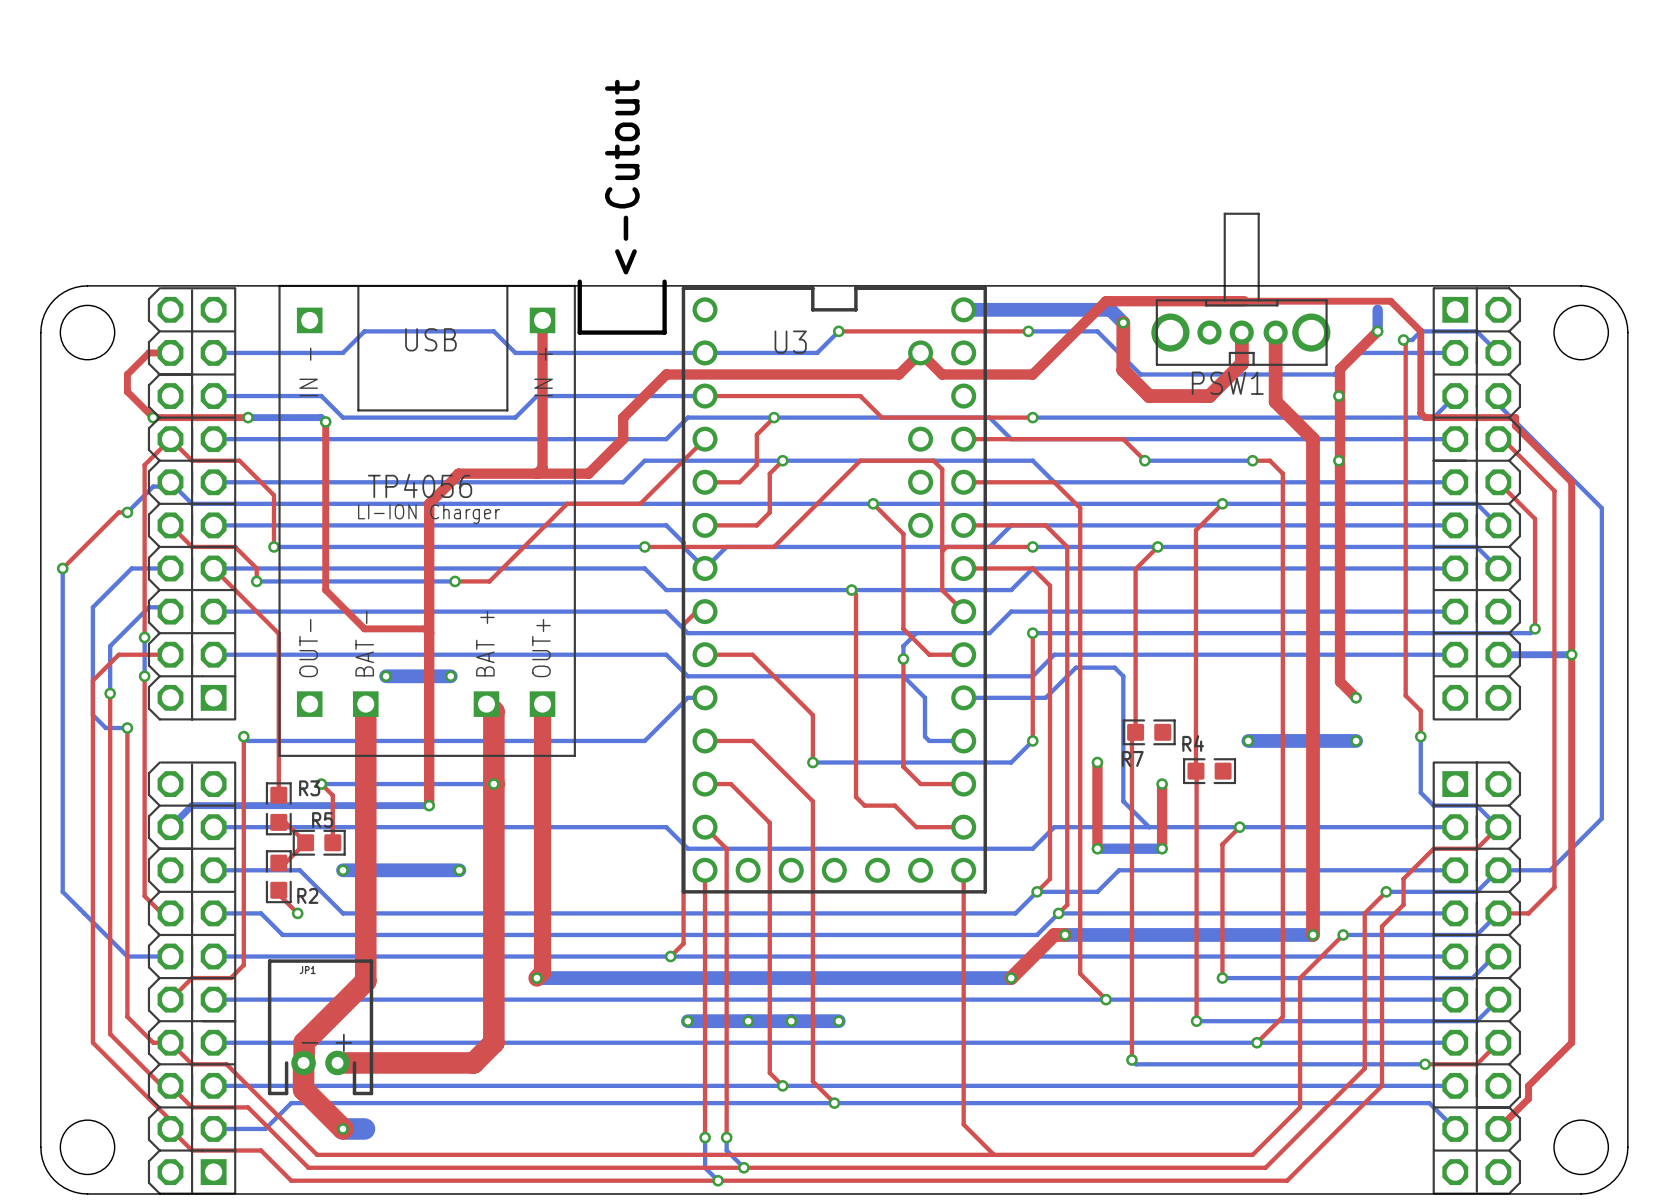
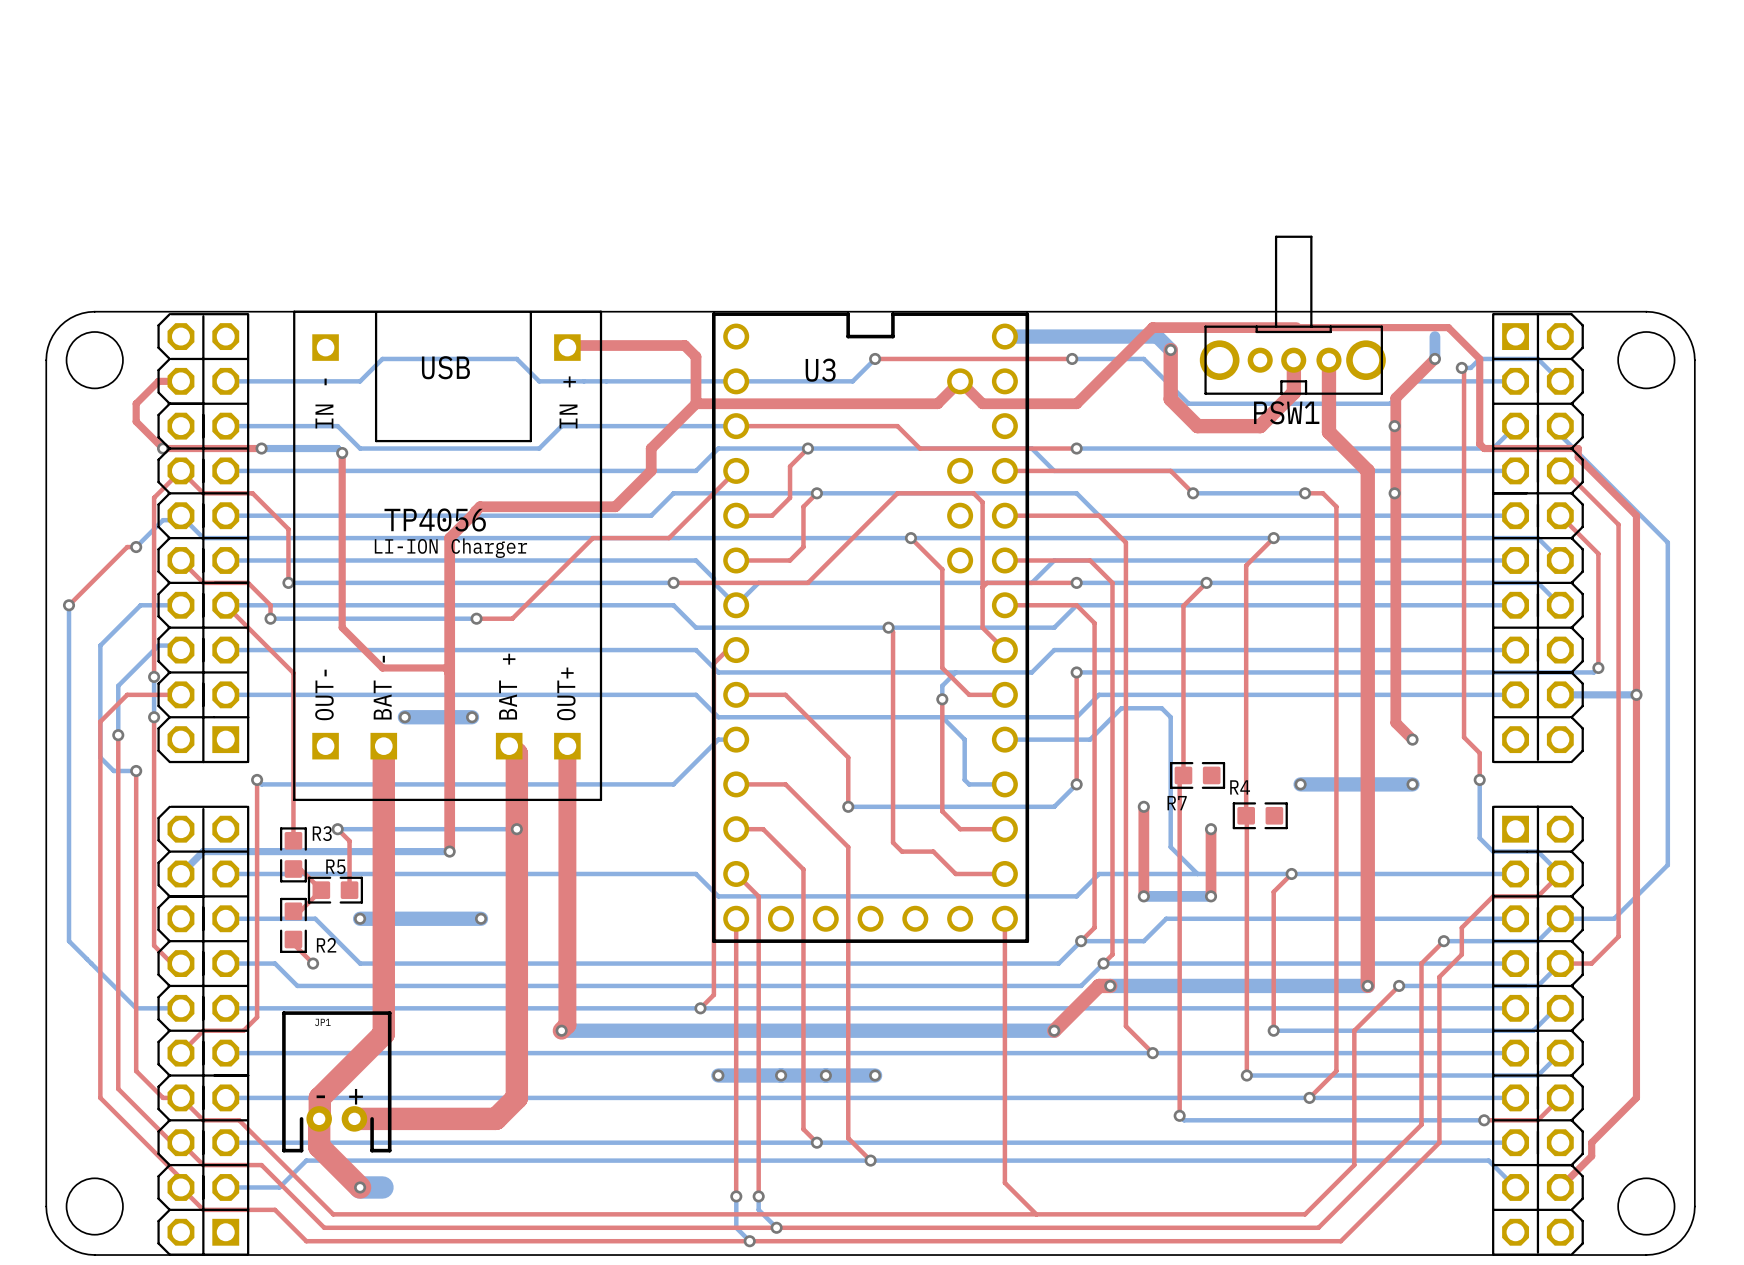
text: <-Cutout (622, 177) -> none
board edge: (579, 281) (579, 332) (664, 332) (664, 281) -> none
top track: (542, 320) (542, 468) (536, 473) -> (567, 347) (569, 345) (684, 345) (695, 356) (695, 403)

